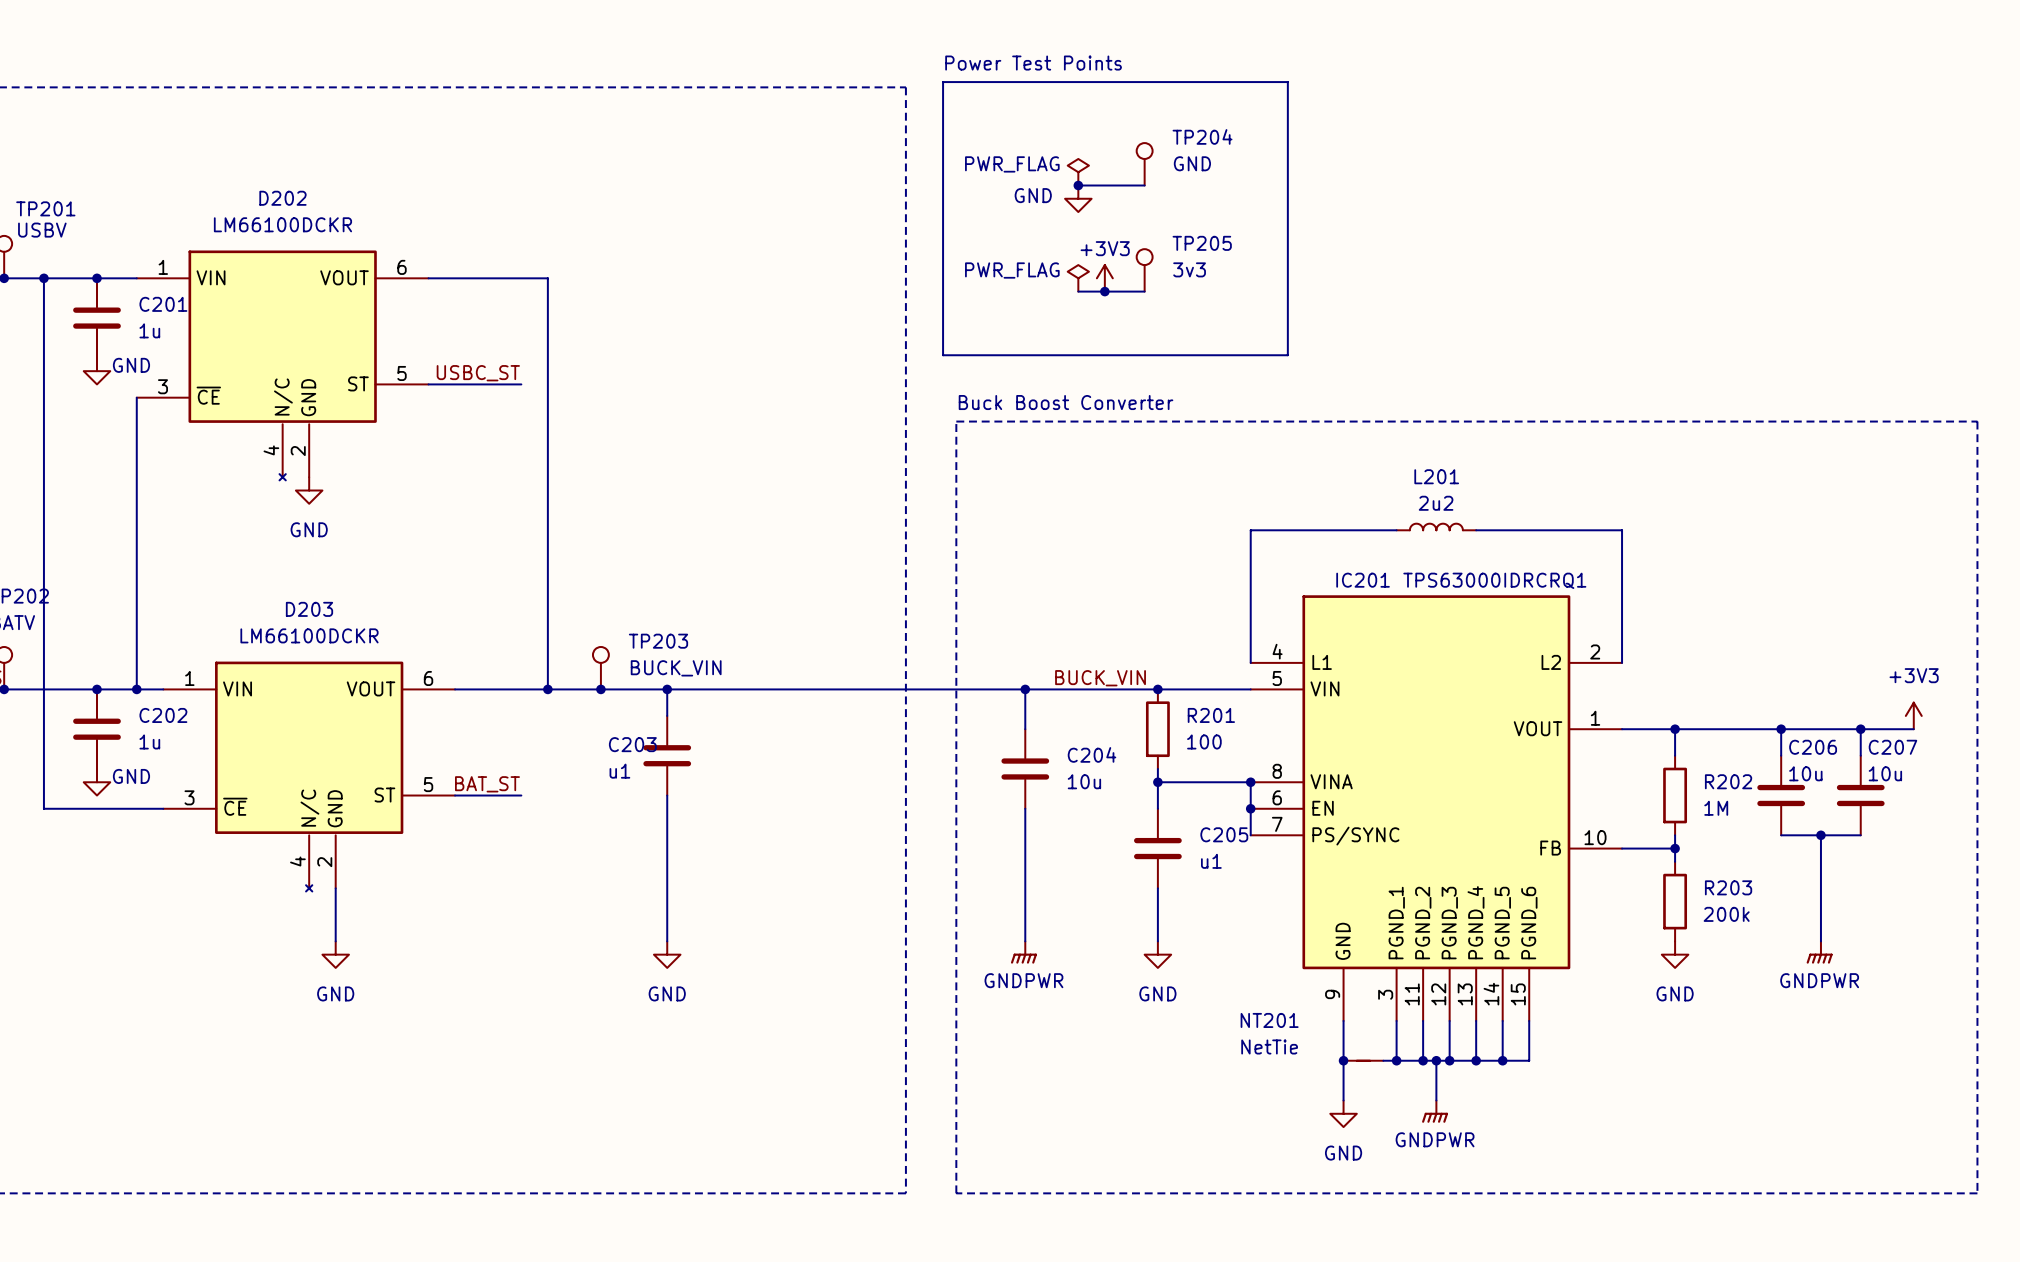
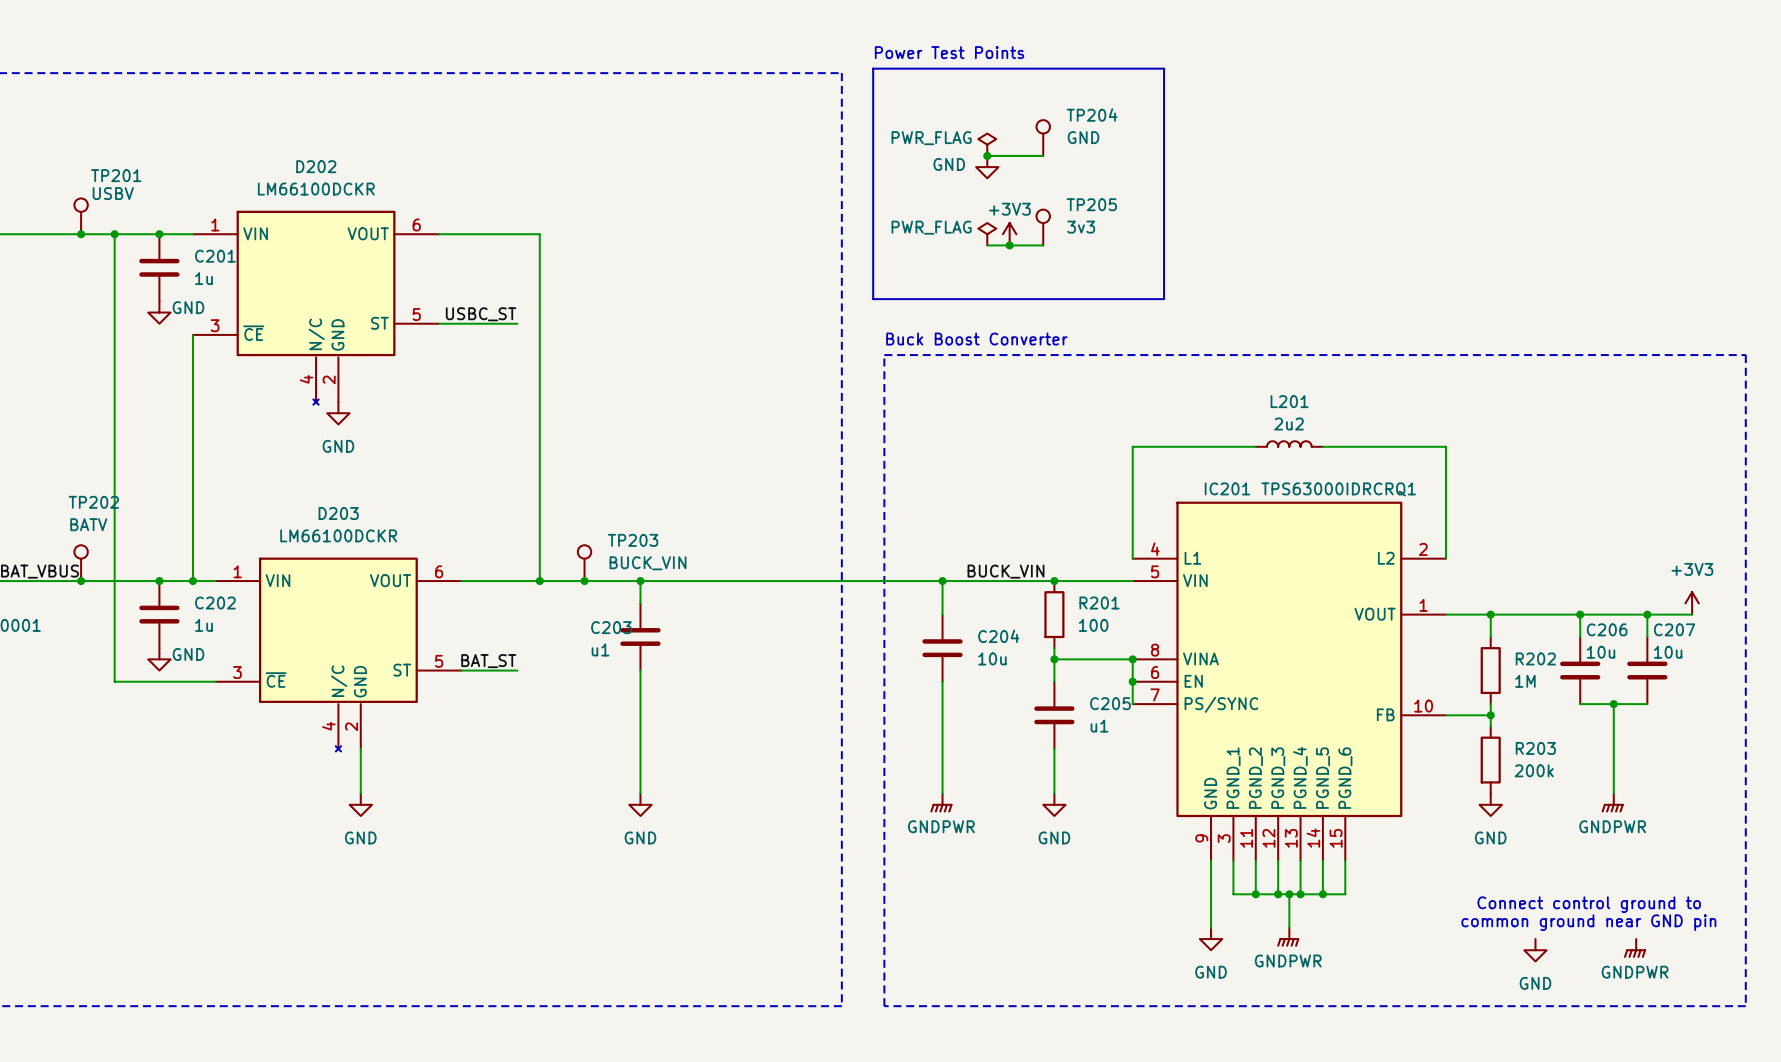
IC201 symbol: [1250, 595, 1623, 1021] -> [1132, 501, 1446, 861]
wire: none -> (1233, 860) (1233, 894) (1244, 894)
wire: (1529, 1020) (1529, 1060) (1502, 1060) -> none
junction: (1343, 1060) -> none
NT201: NetTie (1363, 1060) -> none
junction: (1502, 1060) -> none
text: none -> Connect control ground to (1589, 904)
text: none -> common ground near GND pin (1588, 922)
power symbol: none -> GNDPWR (1635, 948)
power symbol: none -> GND (1535, 950)

